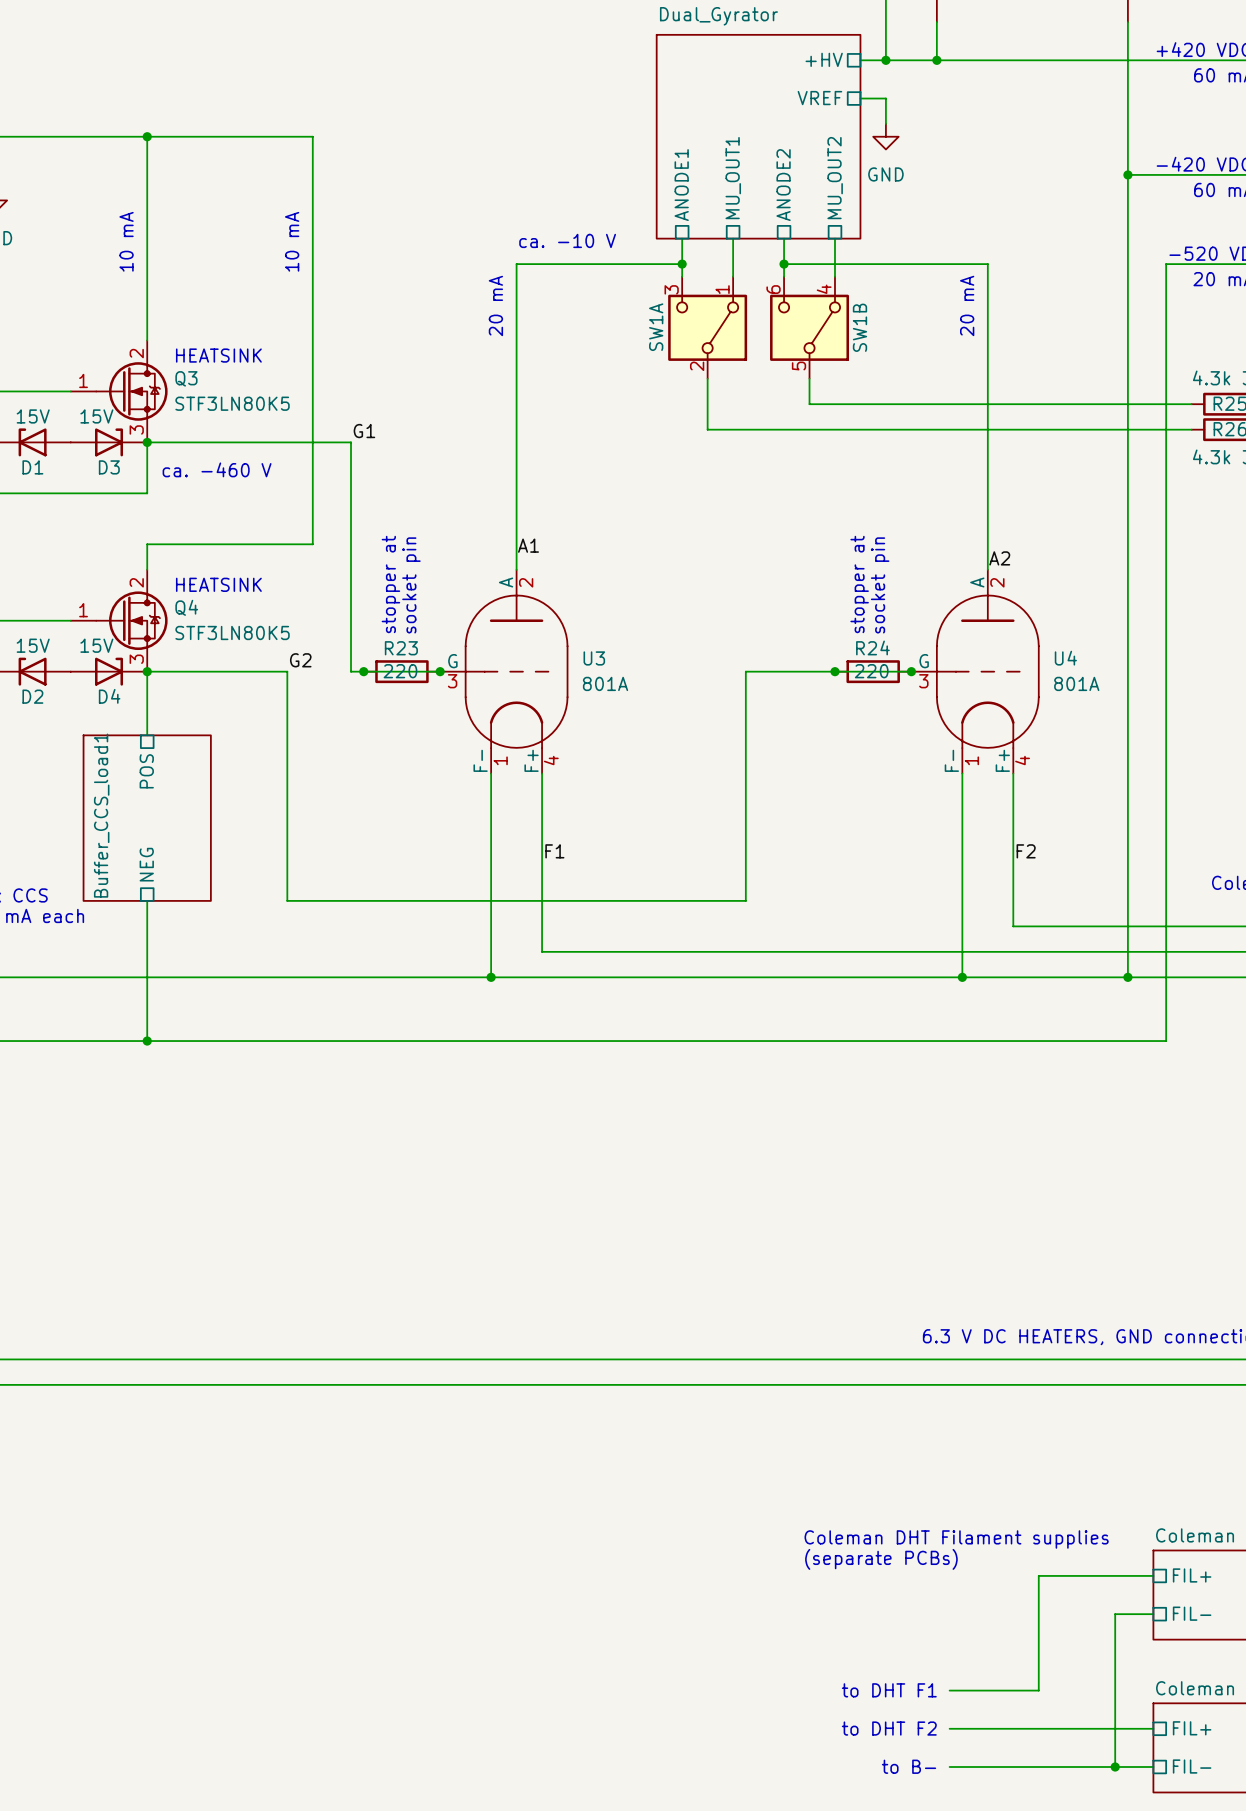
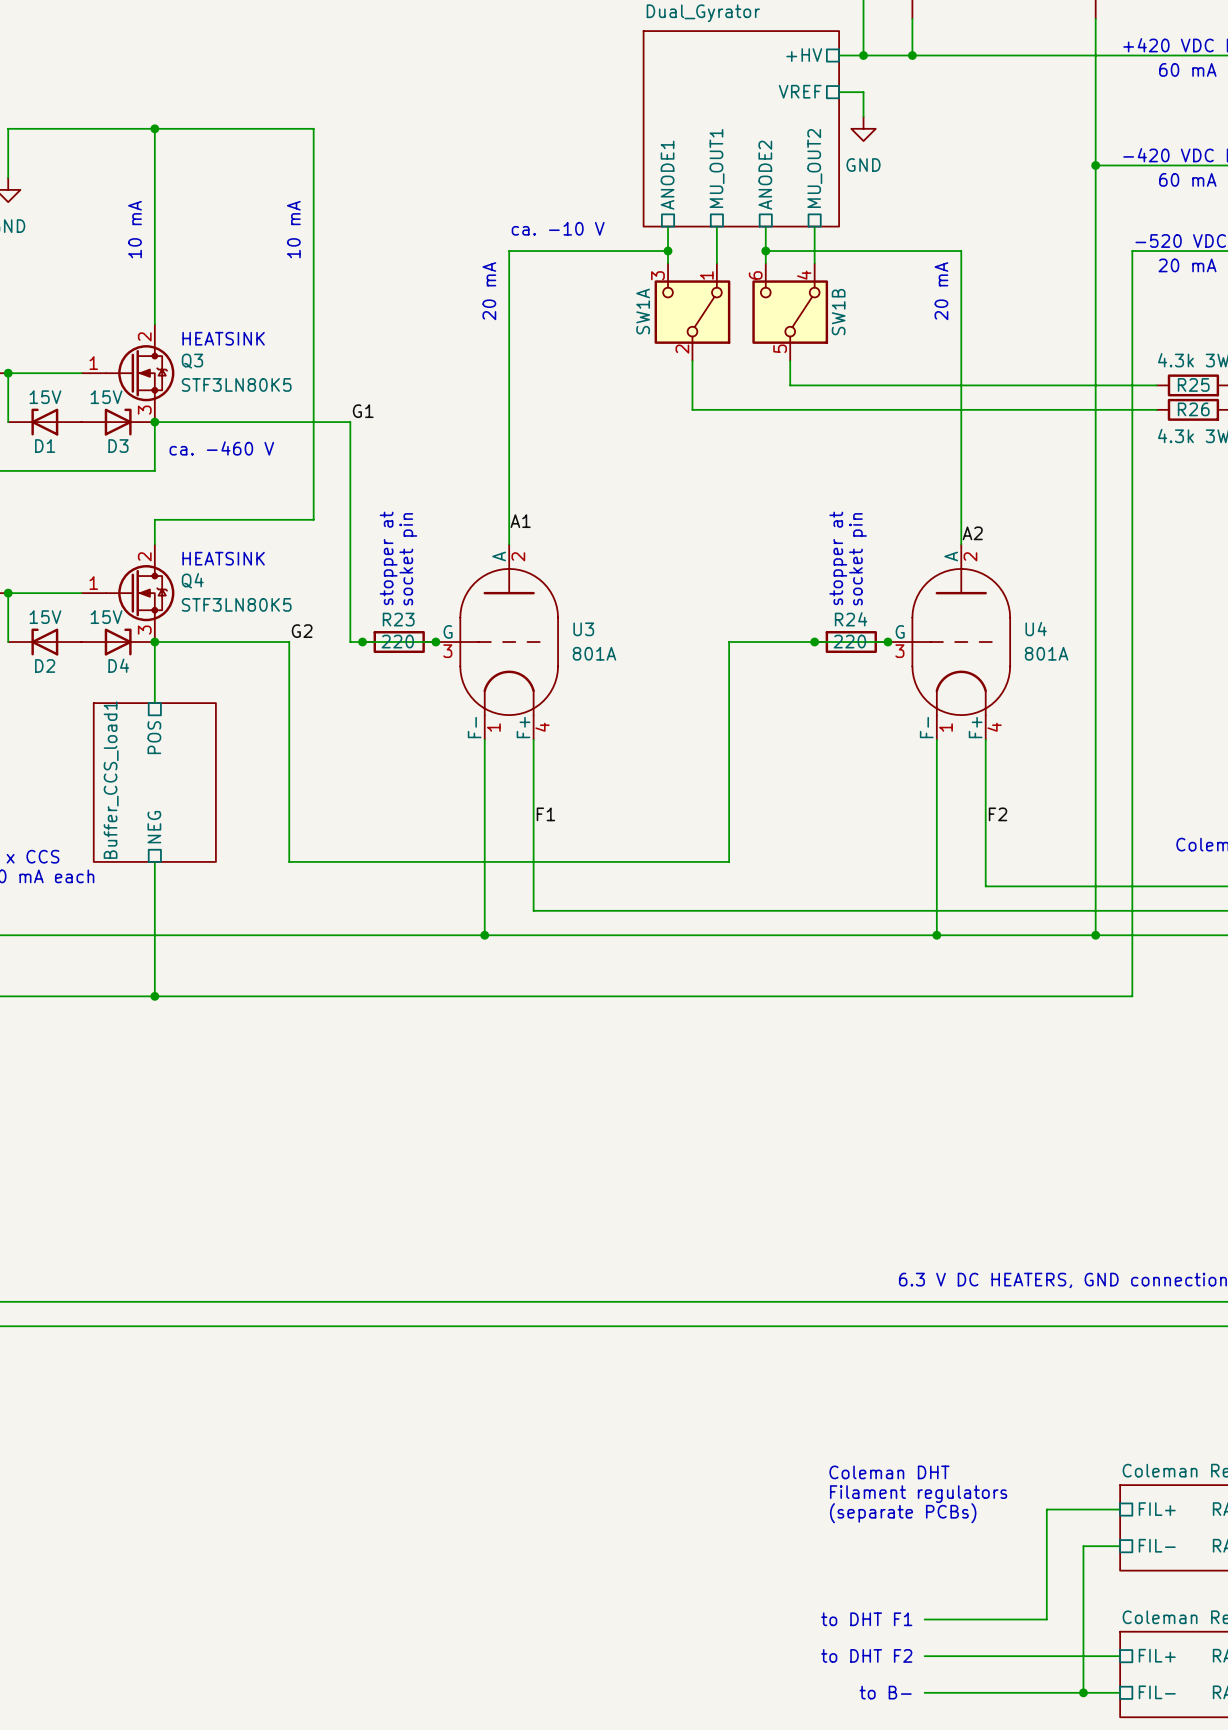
text: none -> Coleman DHT (889, 1472)
text: Coleman DHT Filament supplies (956, 1539) -> none
text position: (separate PCBs) (881, 1559) -> (separate PCBs) (903, 1513)
text: none -> Filament regulators (918, 1494)
wire: (1076, 1575) (1038, 1575) (1038, 1690) -> (1046, 1509) (1046, 1619) (1010, 1619)

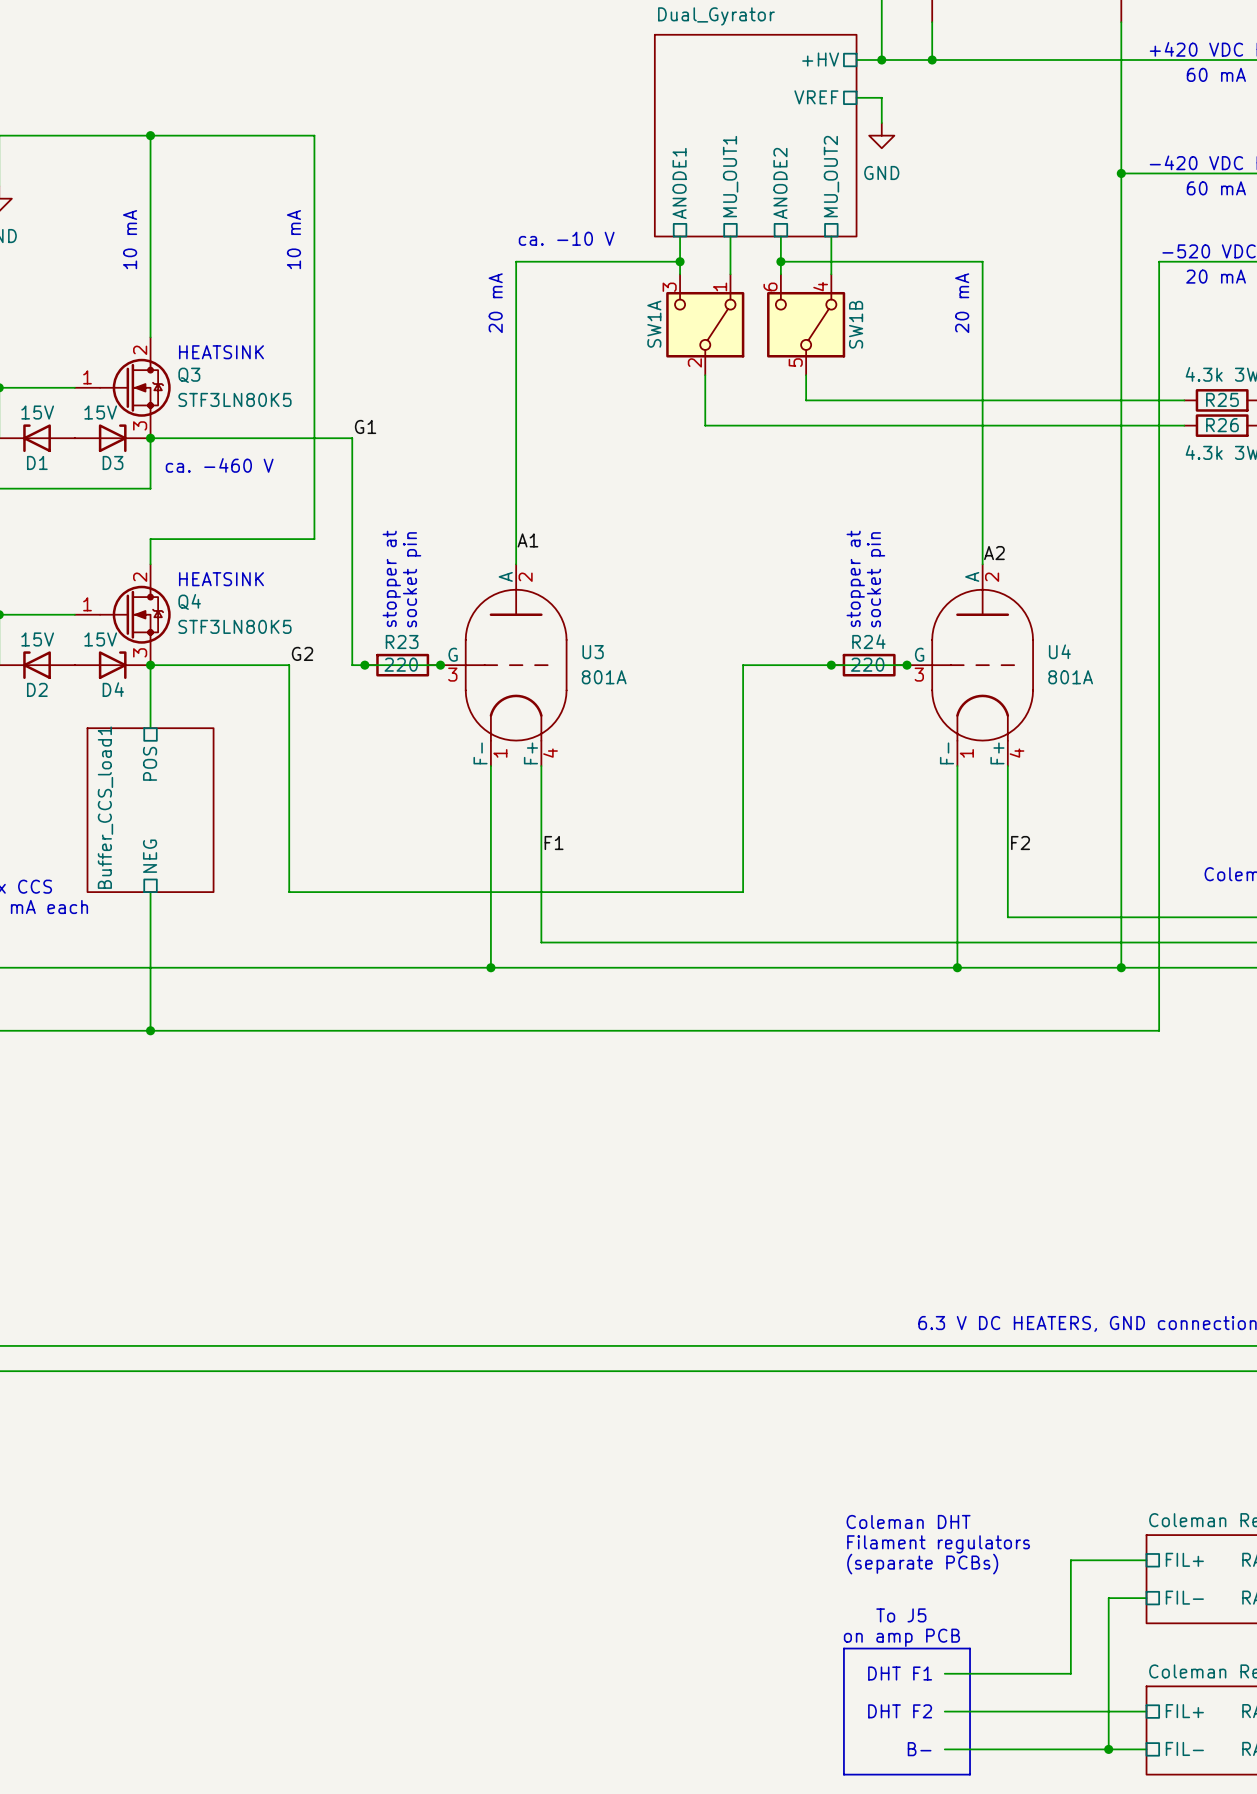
text: none -> To J5 (901, 1615)
text: none -> on amp PCB (901, 1637)
line: none -> (843, 1648) (970, 1648) (970, 1774) (843, 1774) (843, 1648)
text: to DHT F1 (866, 1619) -> DHT F1 (900, 1673)
text: to DHT F2 (866, 1655) -> DHT F2 (900, 1711)
text: to B- (885, 1692) -> B- (919, 1749)

